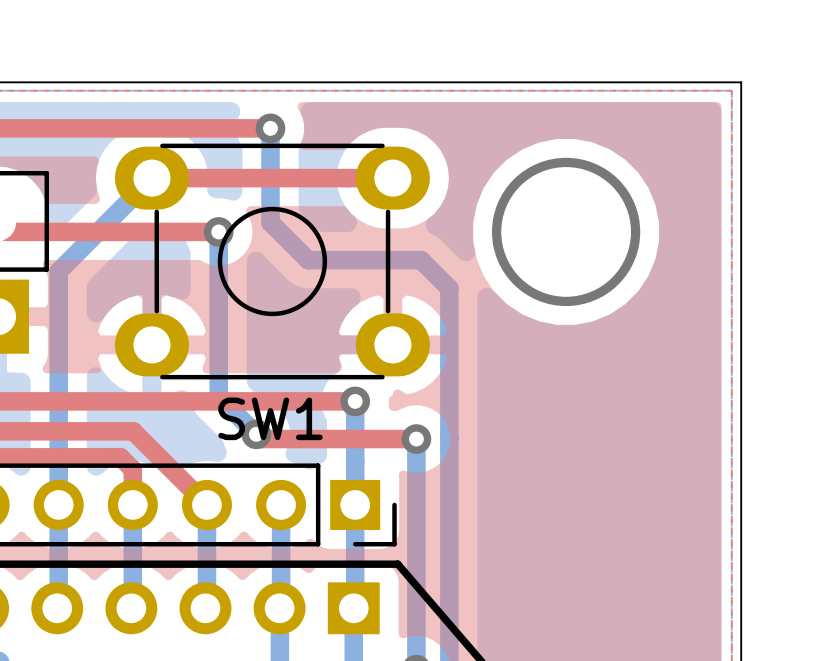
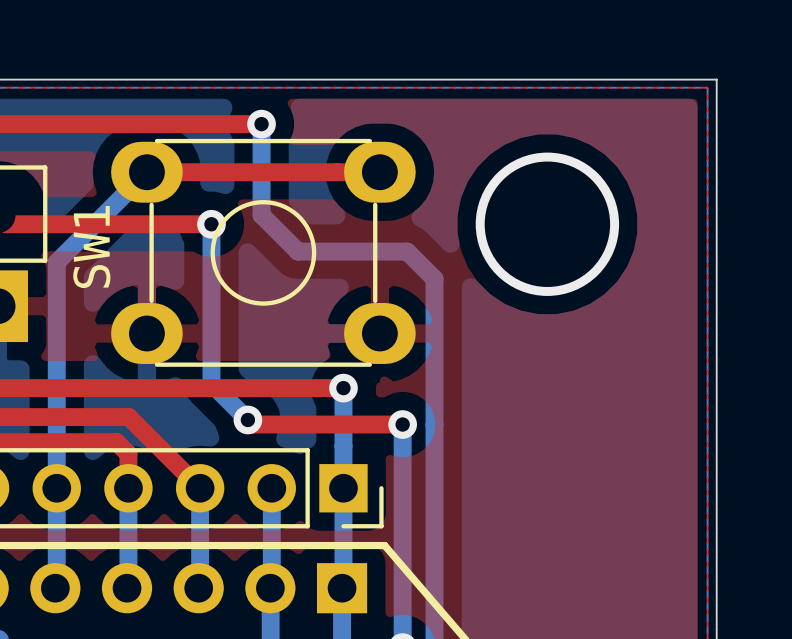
SW1 name rotation: 0° (270, 418) -> 90° counterclockwise (91, 247)
SW1 name position: SW1 (270, 418) -> SW1 (91, 247)

